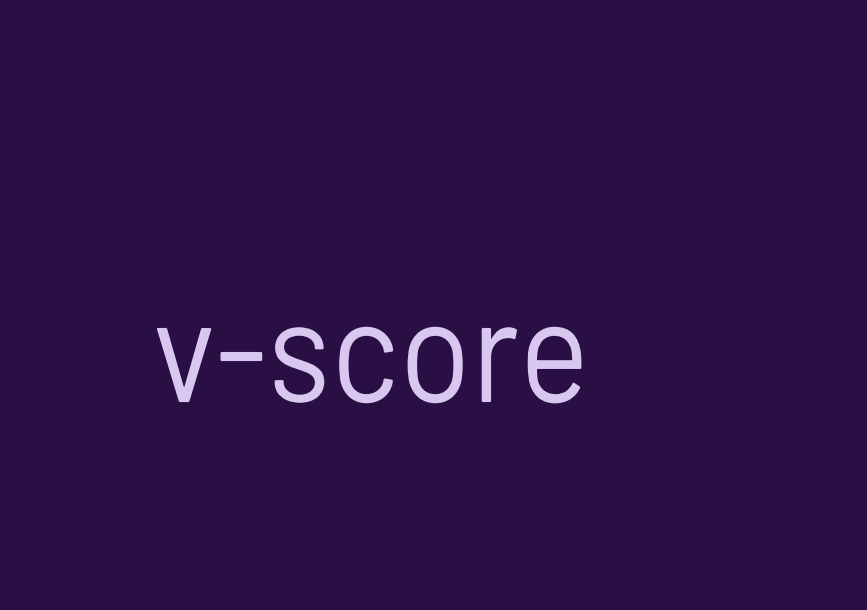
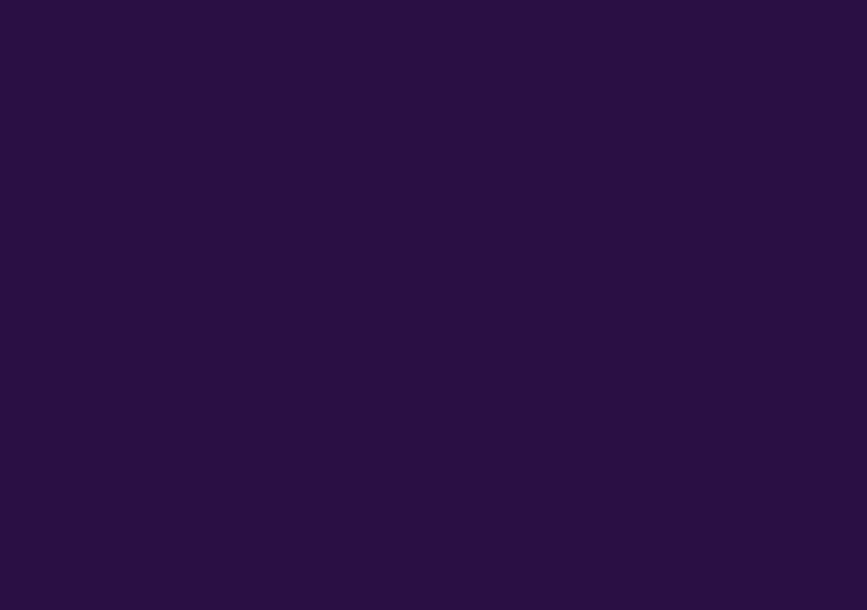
text: v-score (369, 365) -> none

